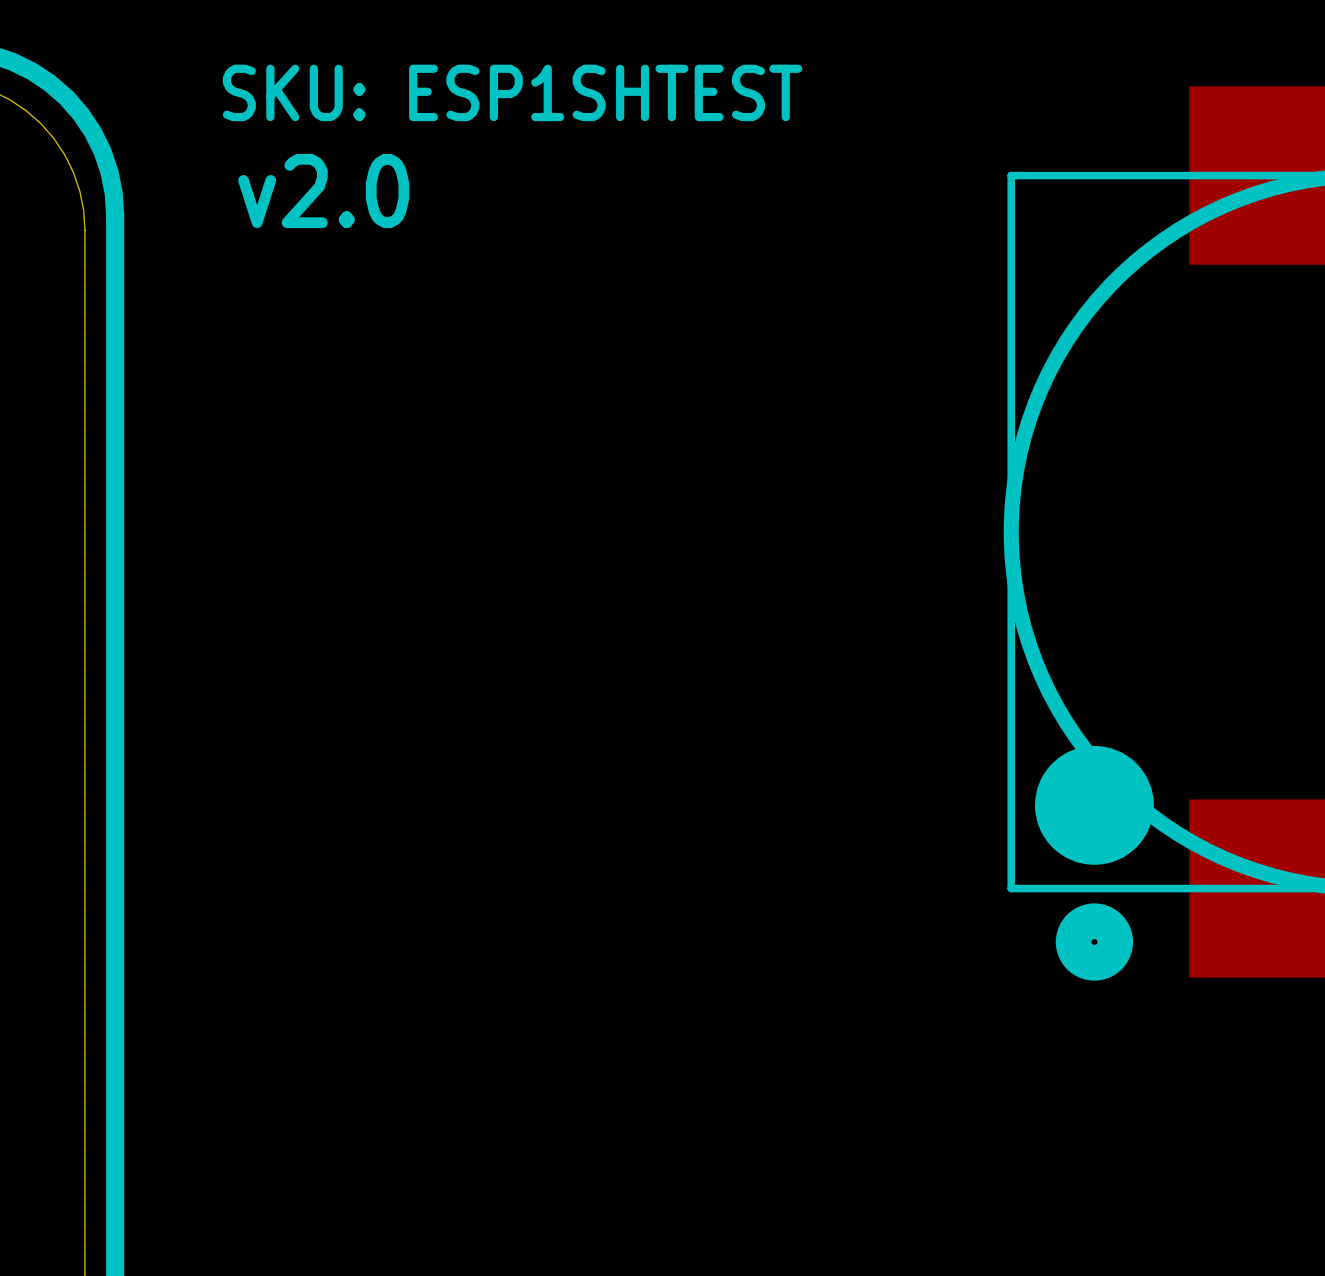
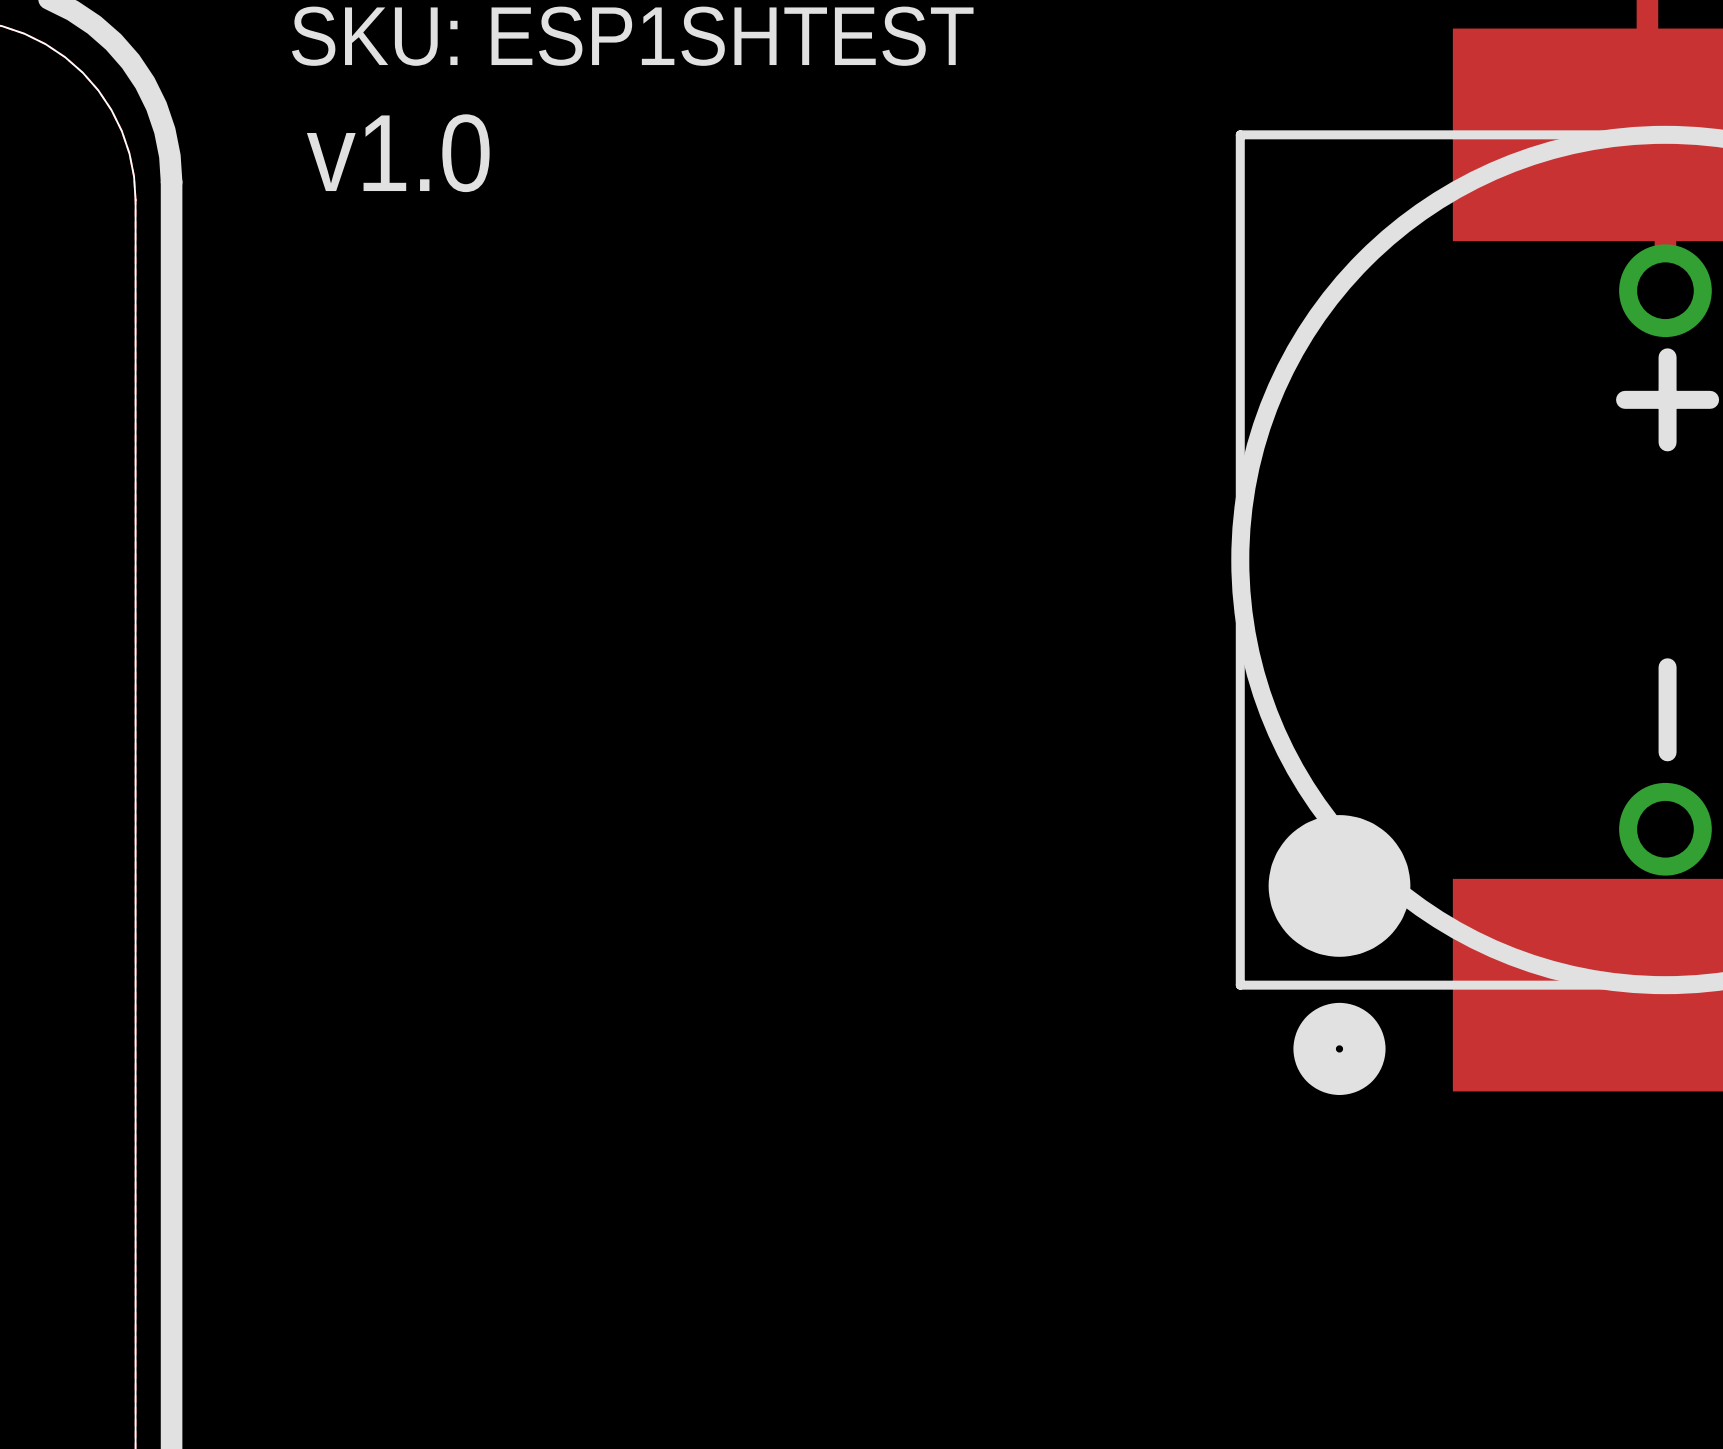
text: v2.0 (323, 191) -> v1.0 (398, 153)

